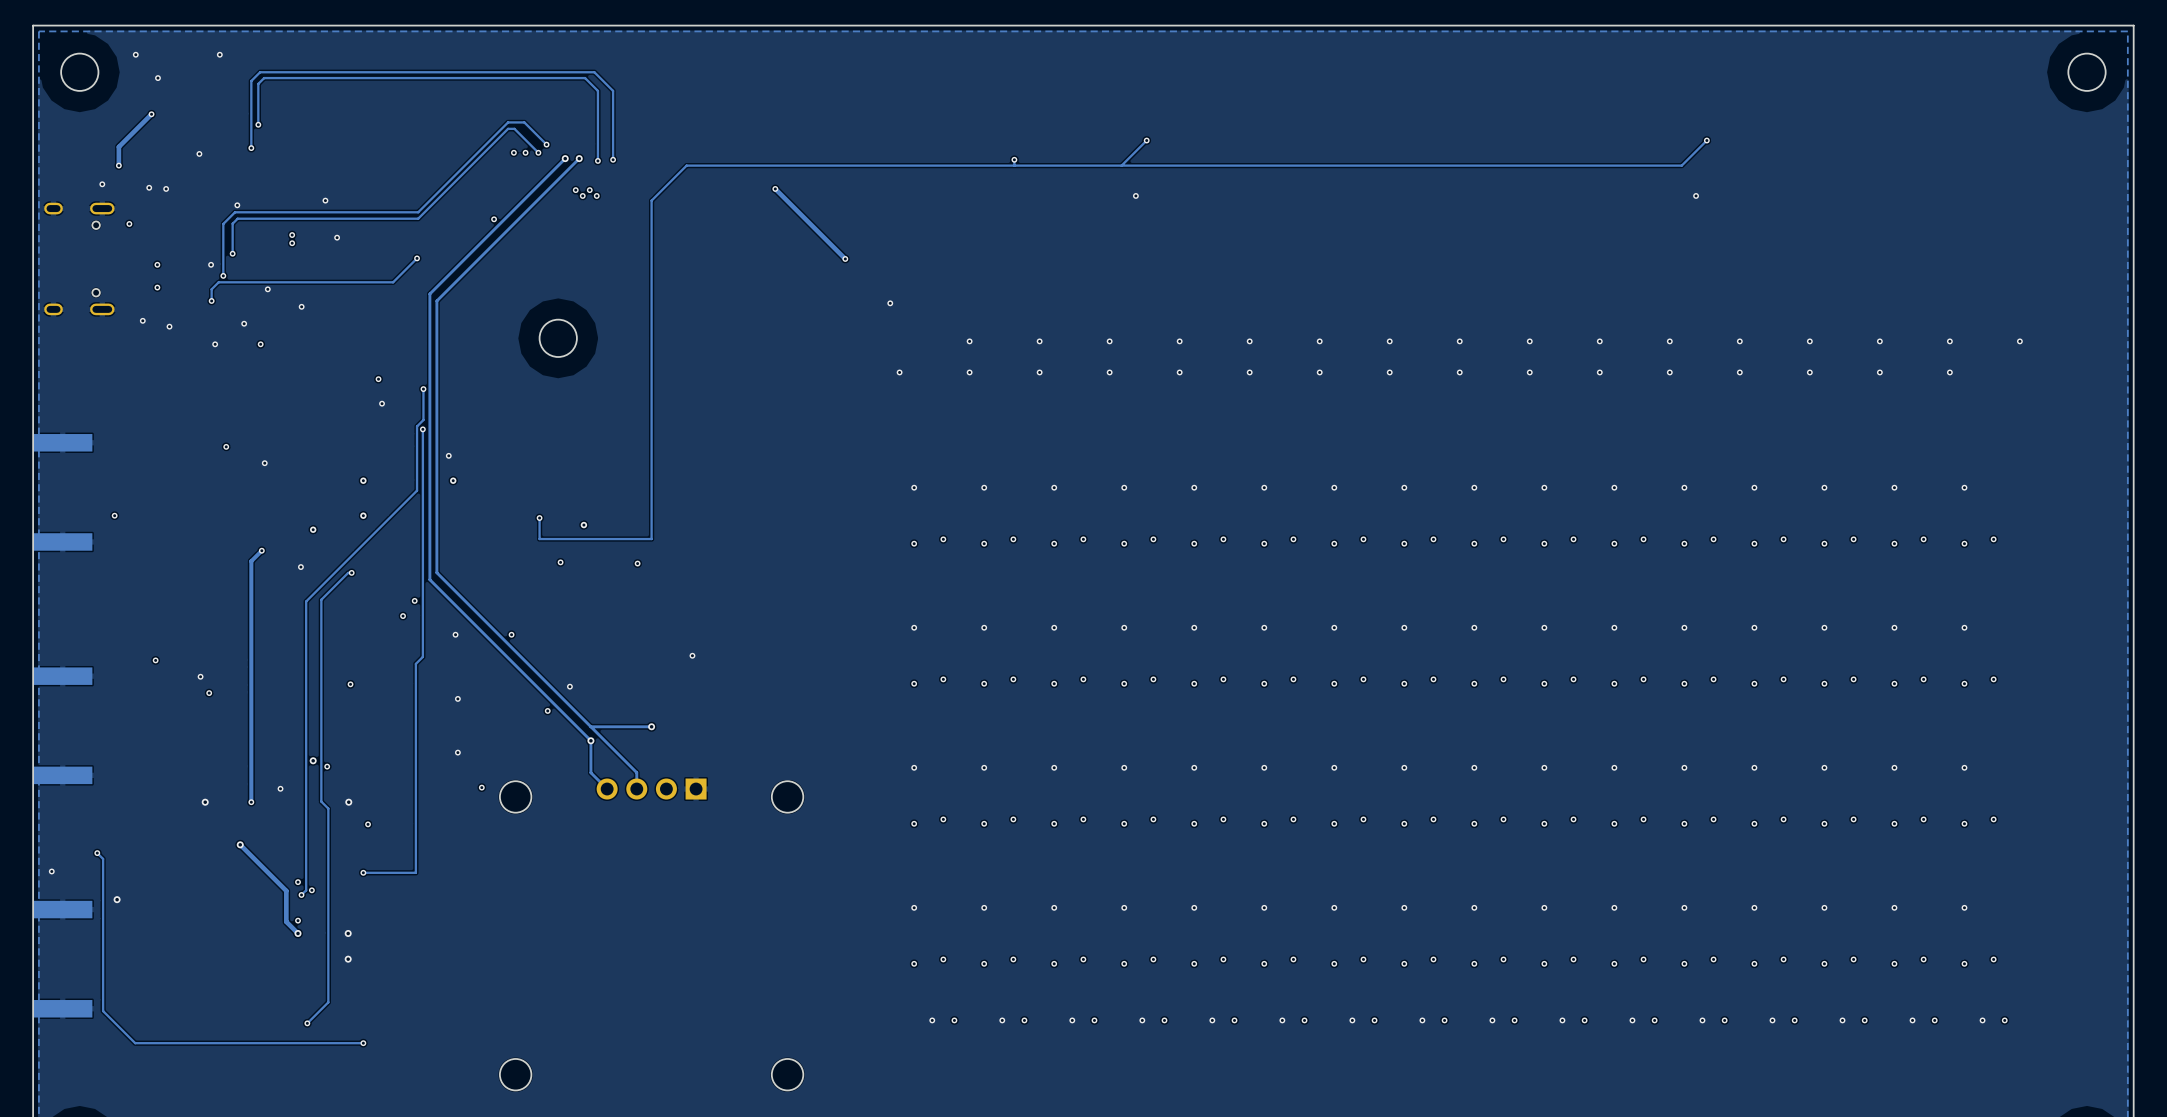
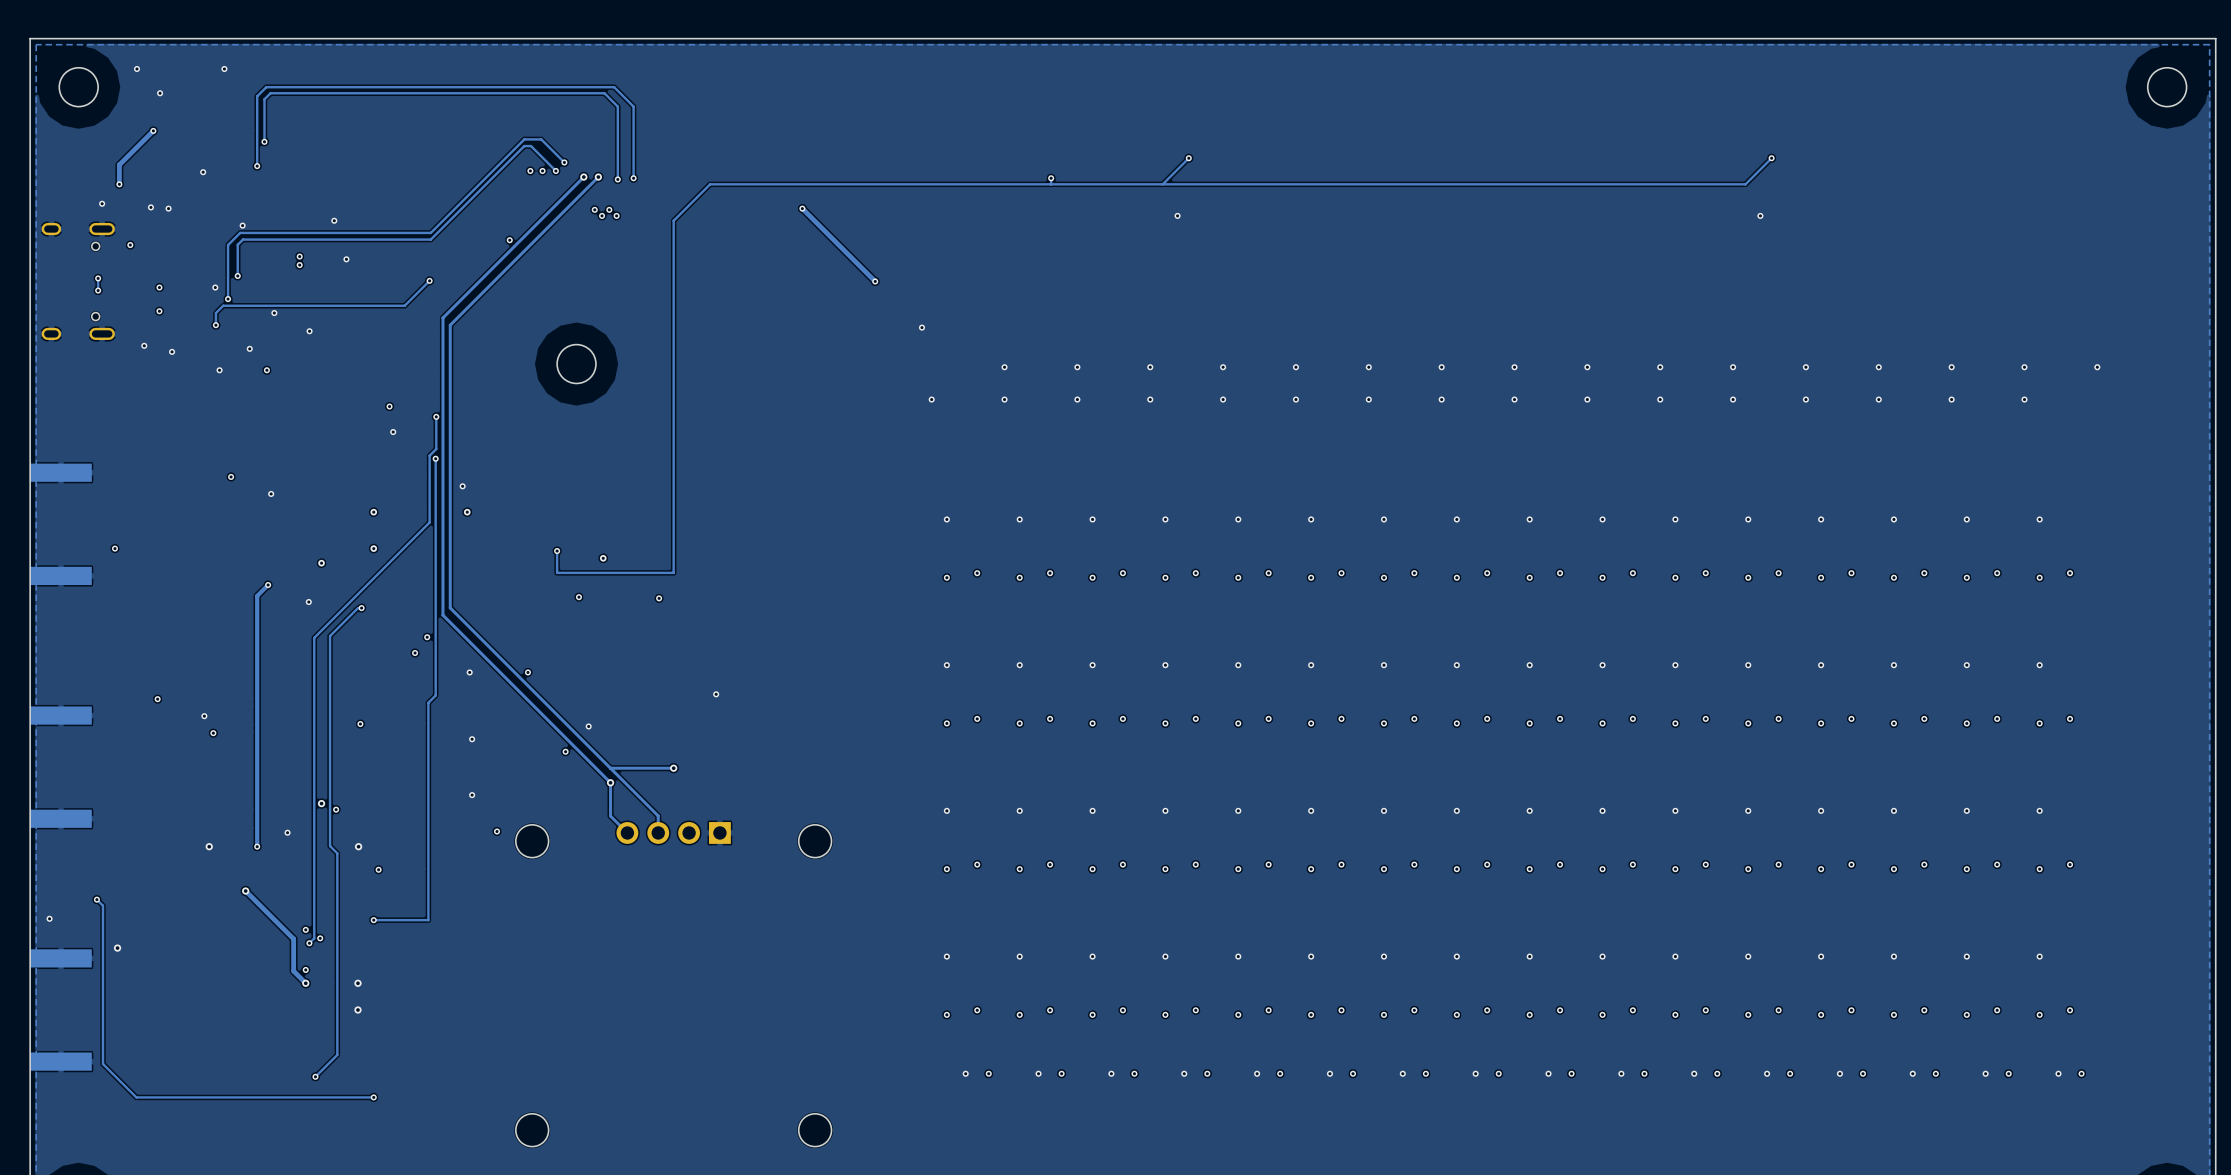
track: none -> (98, 278) (98, 290)
via: none -> (98, 278)
via: none -> (98, 290)

